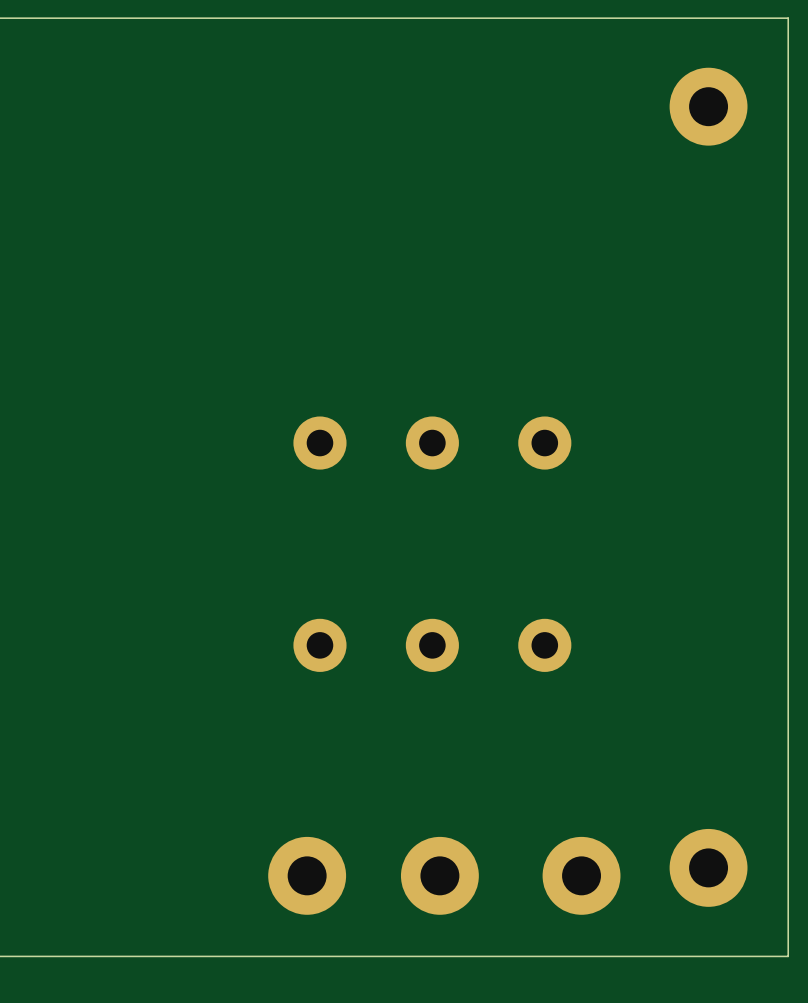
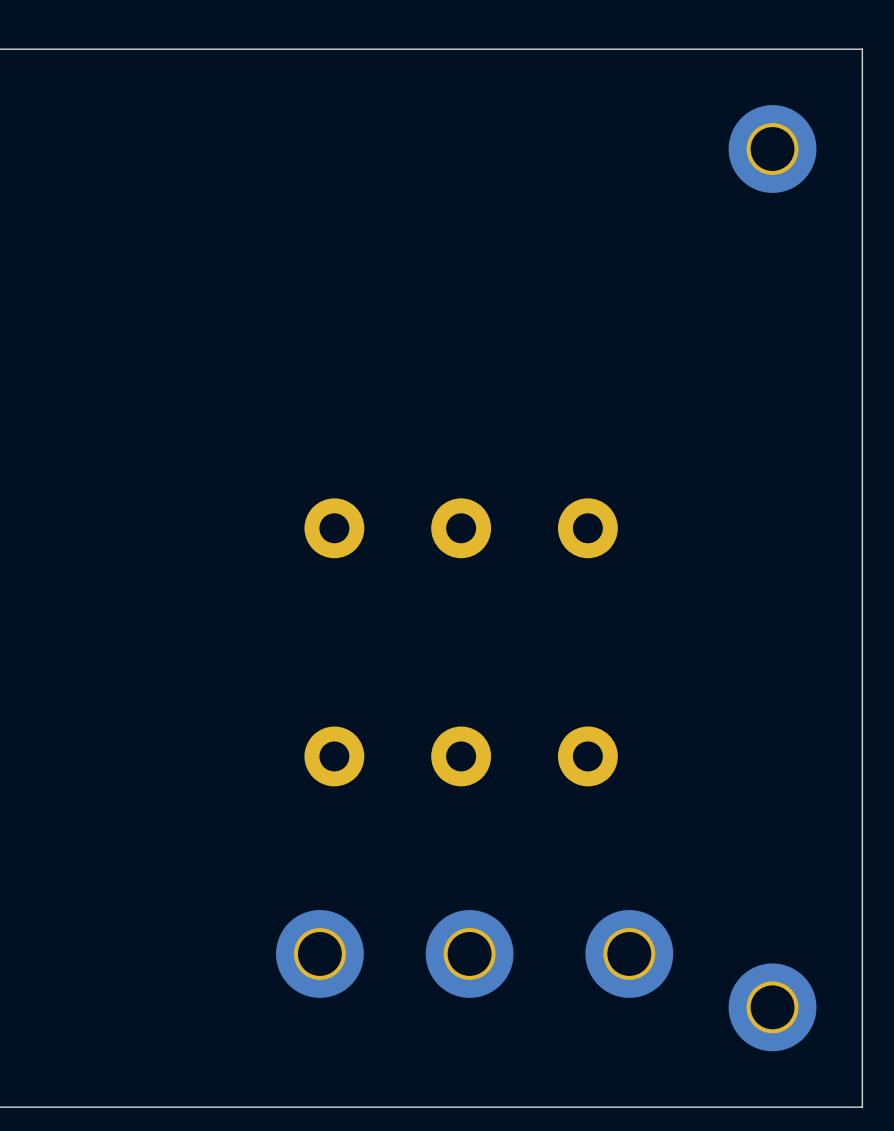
part position: (307, 875) -> (319, 953)
part position: (439, 875) -> (469, 953)
part position: (581, 875) -> (629, 953)

